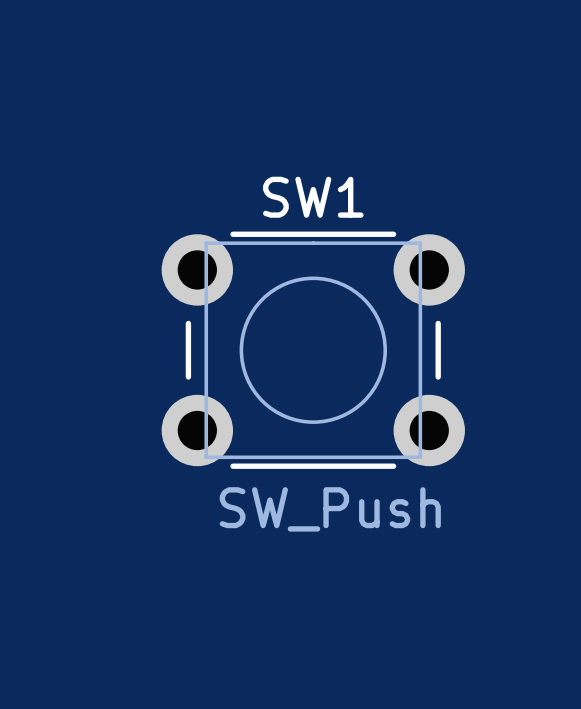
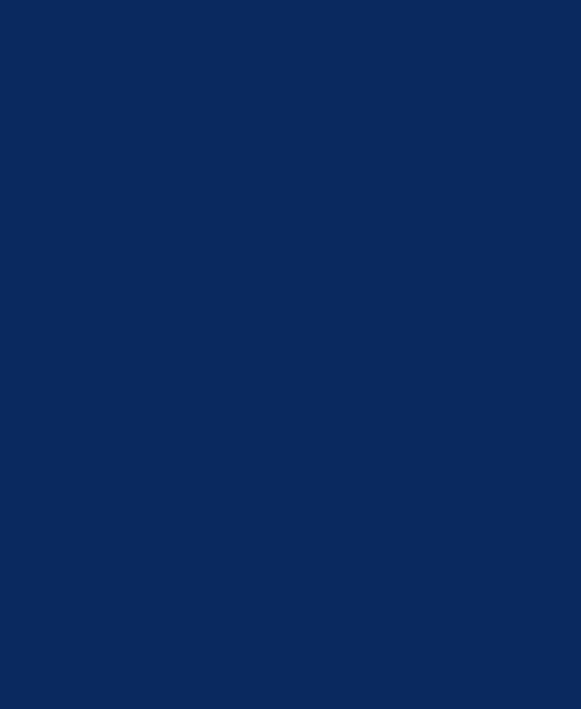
SW1: SW_Push (313, 350) -> none

